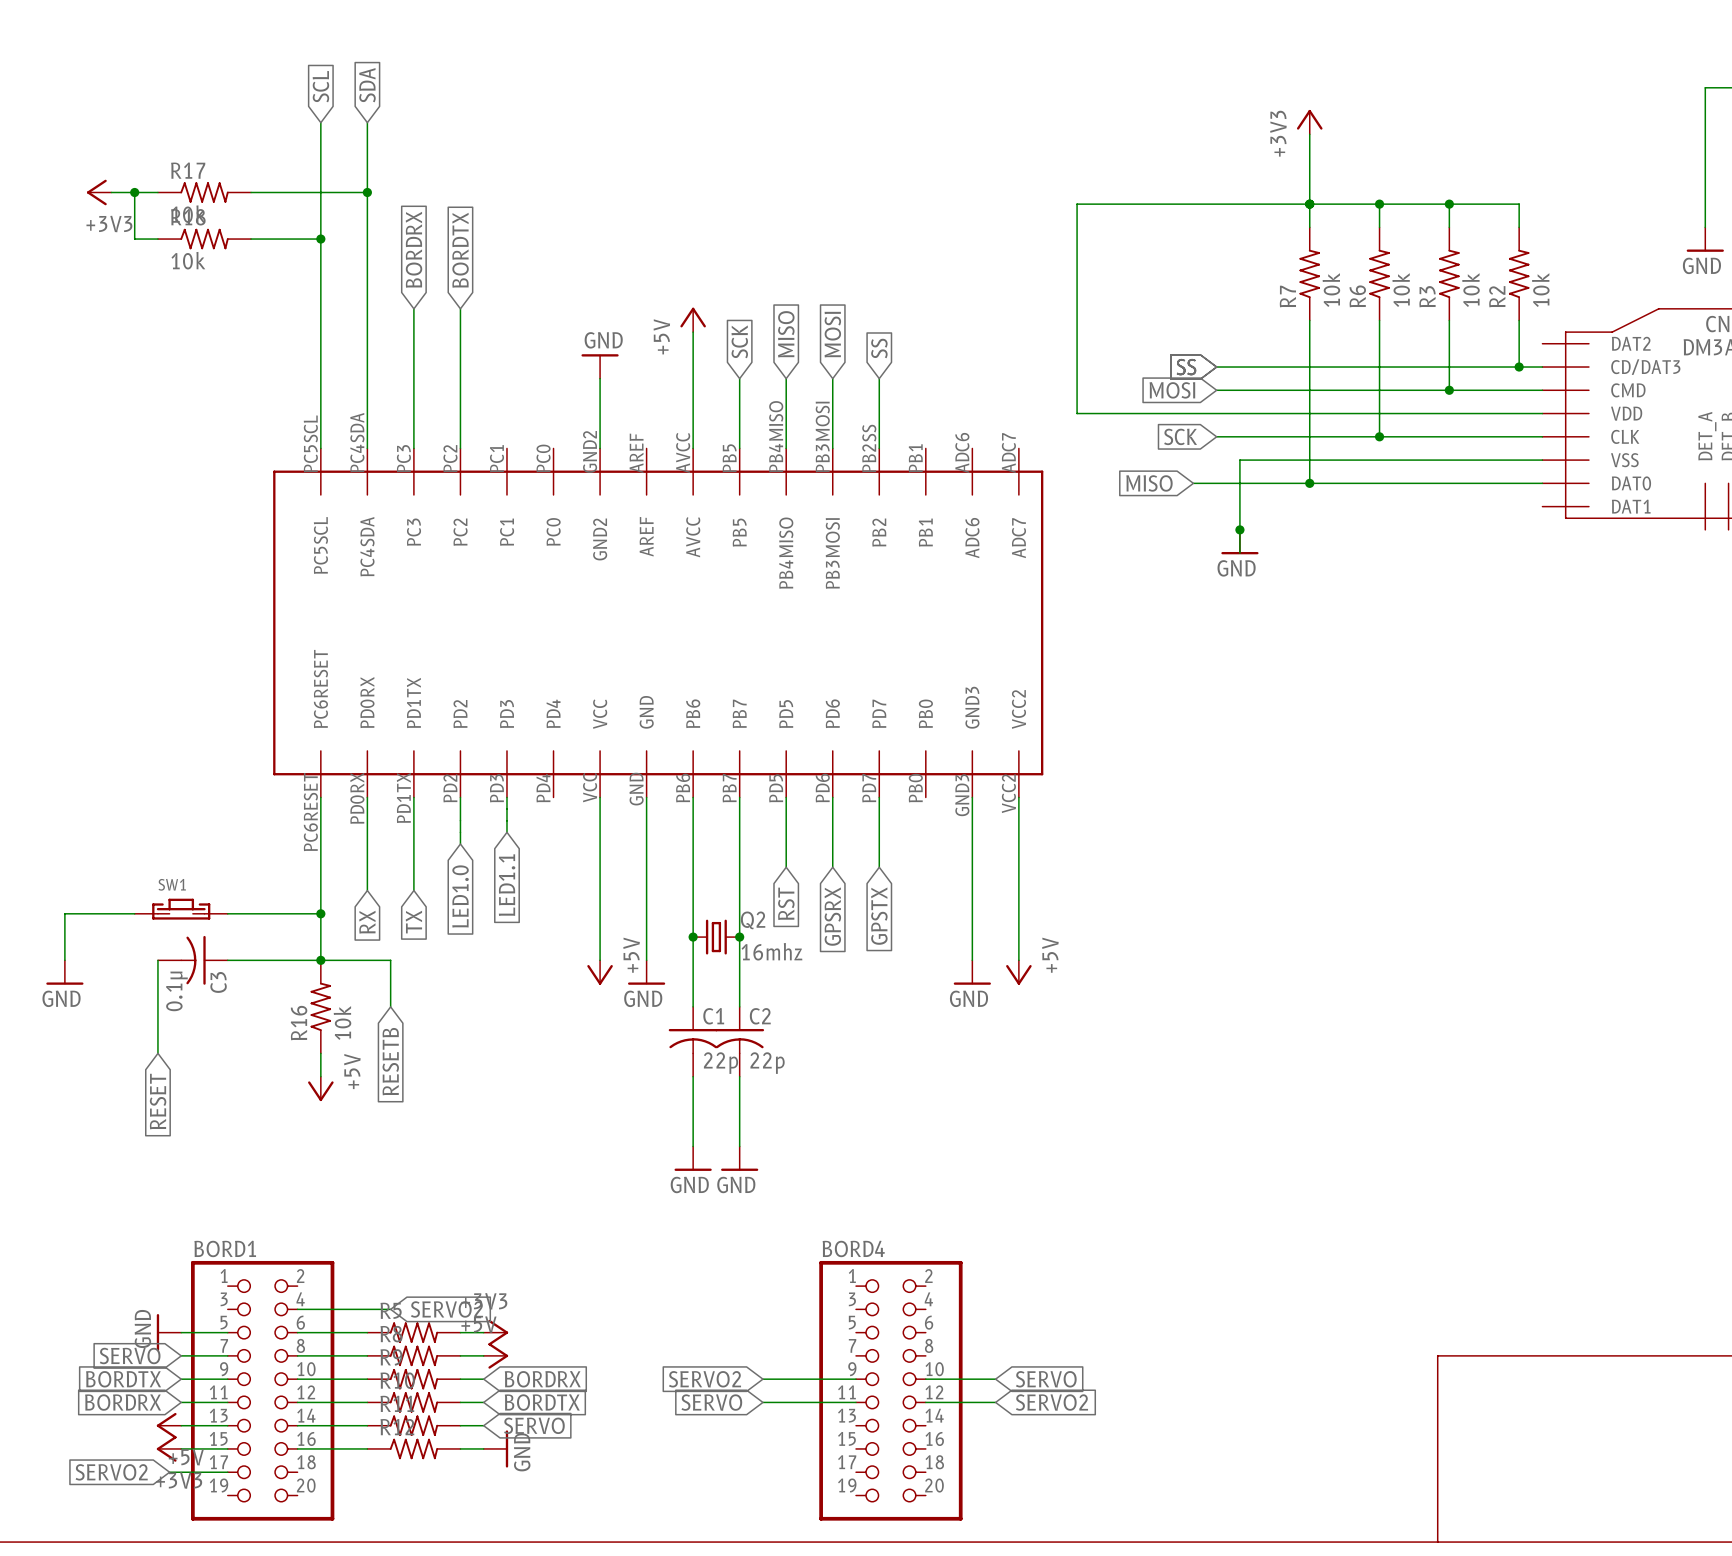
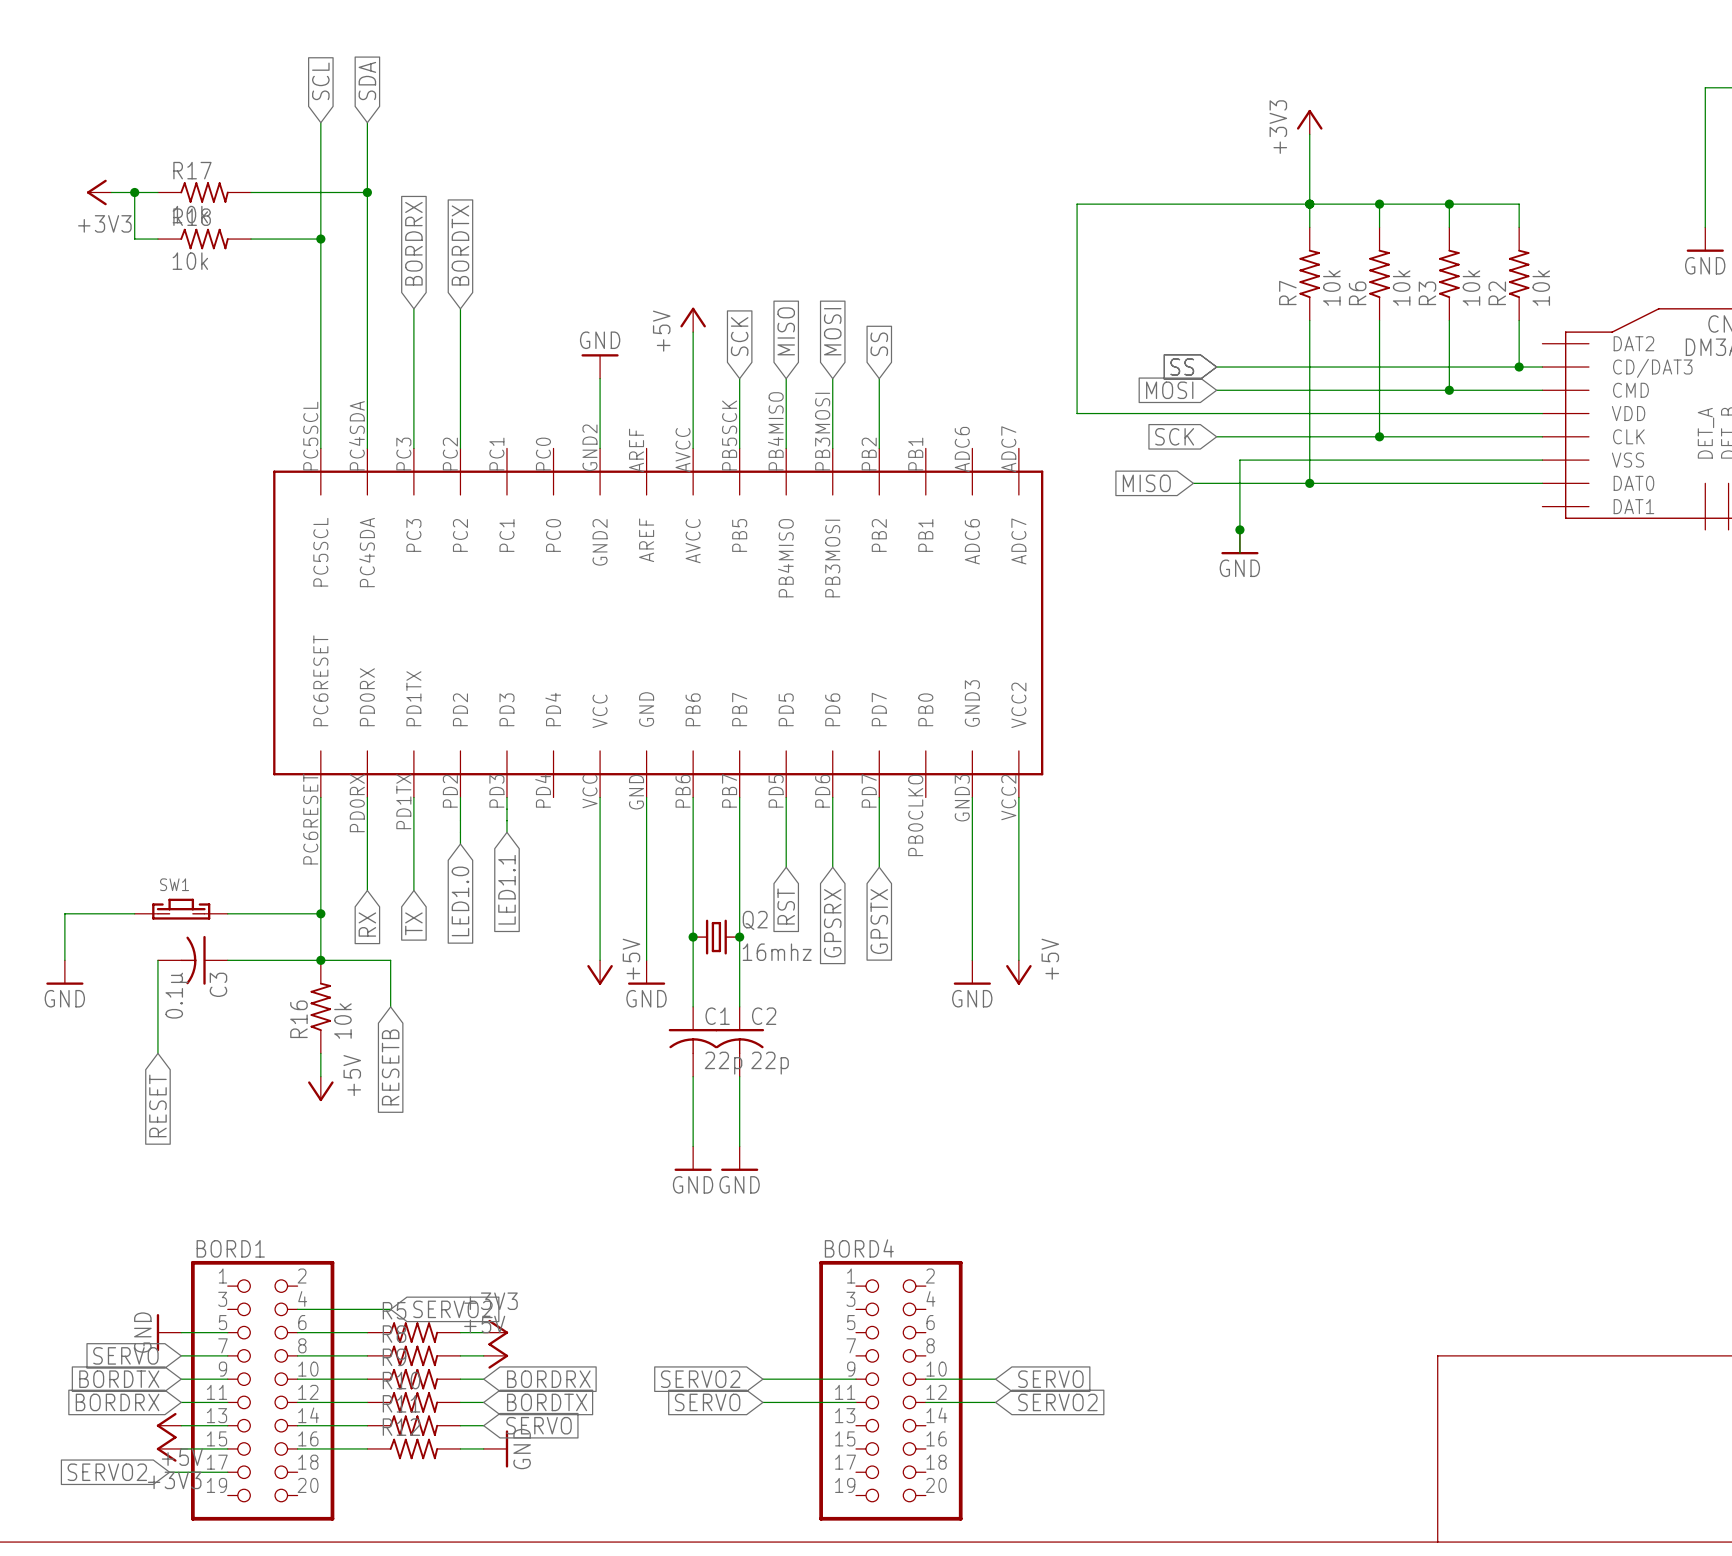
part pin number: PB2SS (869, 448) -> PB2 (869, 454)
part pin number: PB5 (729, 458) -> PB5SCK (729, 435)
part pin number: PB0 (915, 788) -> PB0CLKO (915, 815)

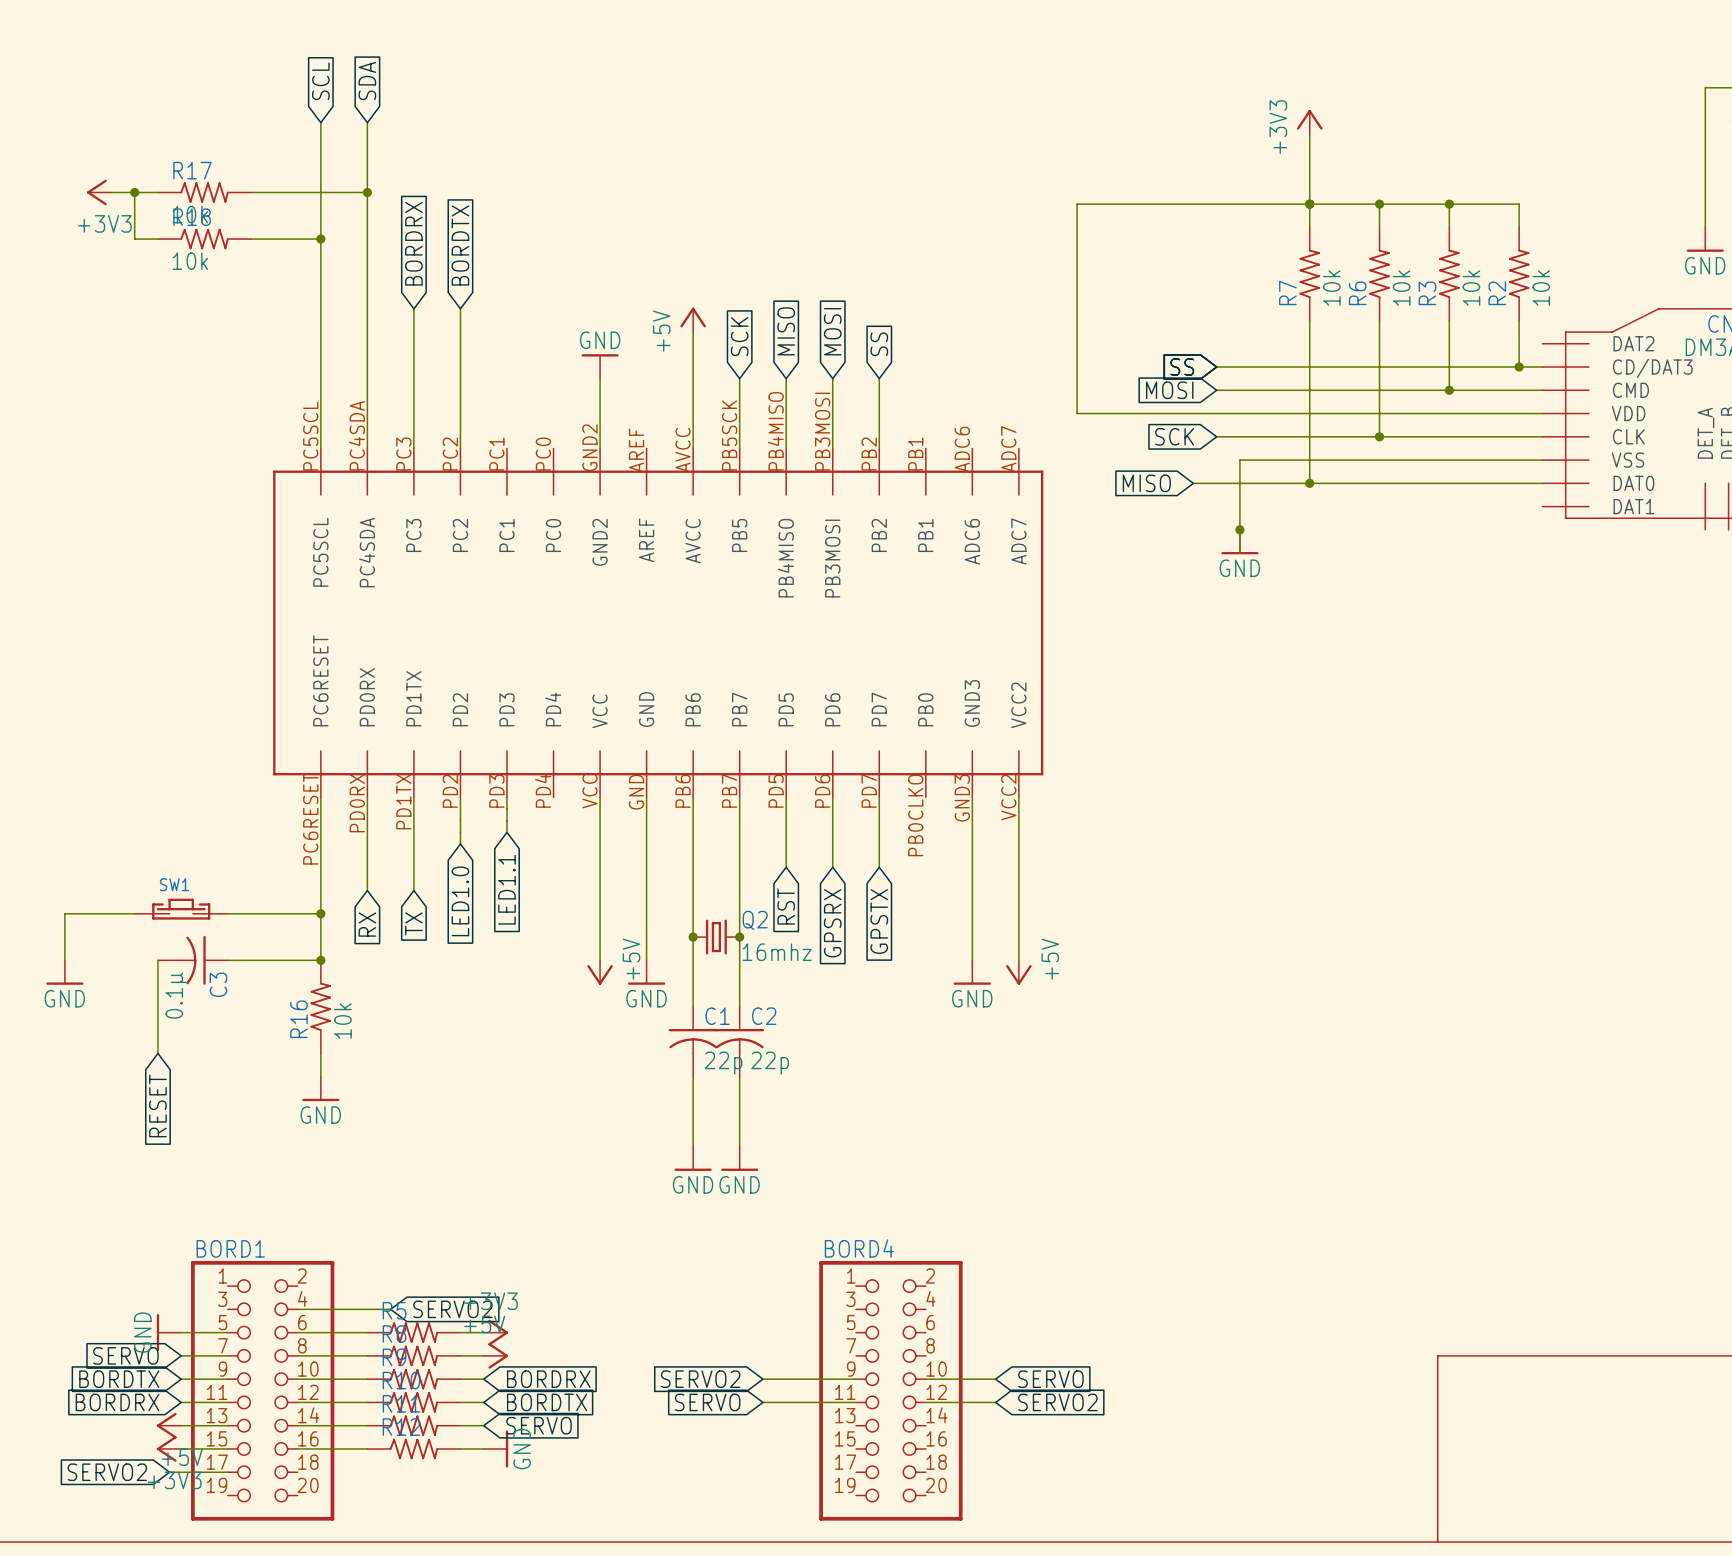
wire: (320, 960) (390, 960) (390, 1006) -> none
global label: RESETB (390, 1067) -> none
power symbol: +5V (320, 1088) -> GND (320, 1088)

